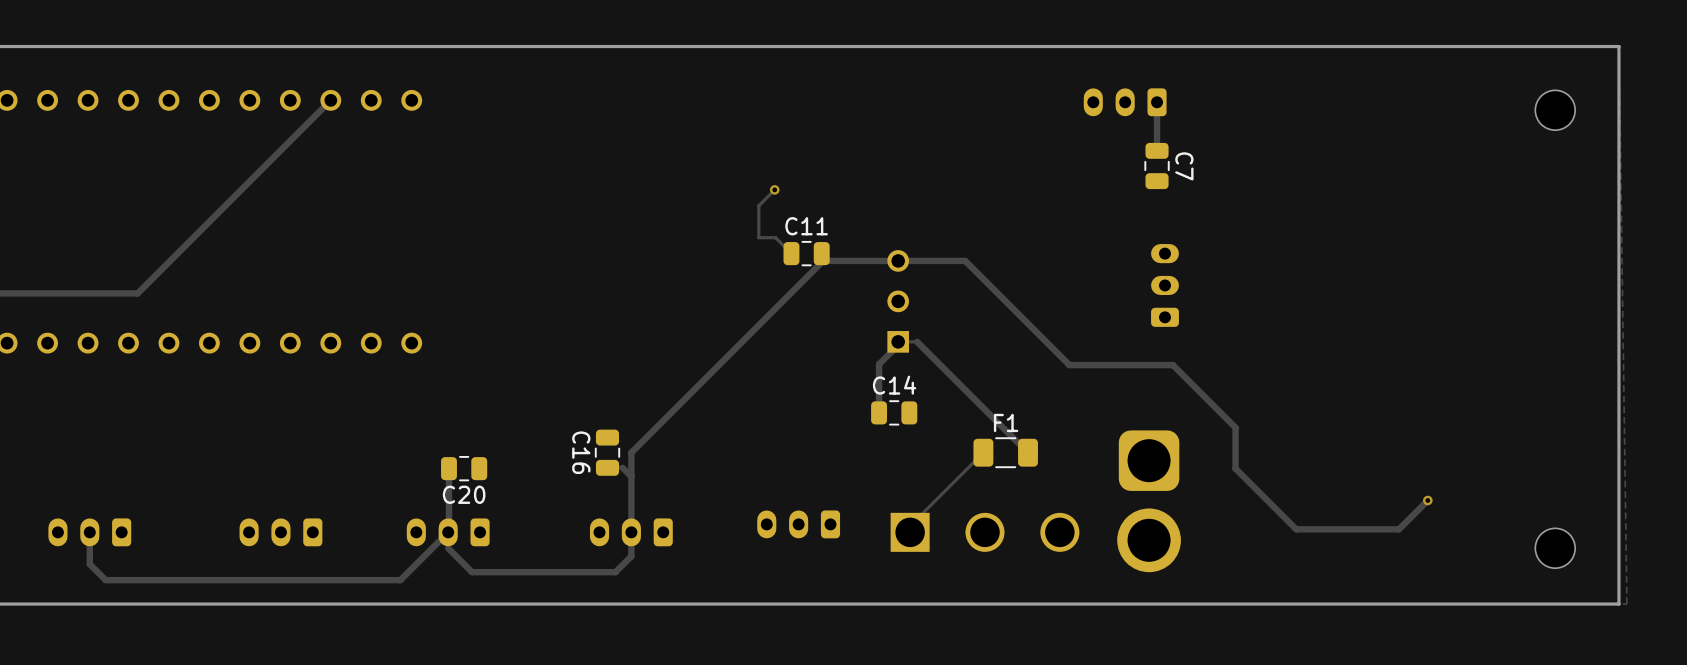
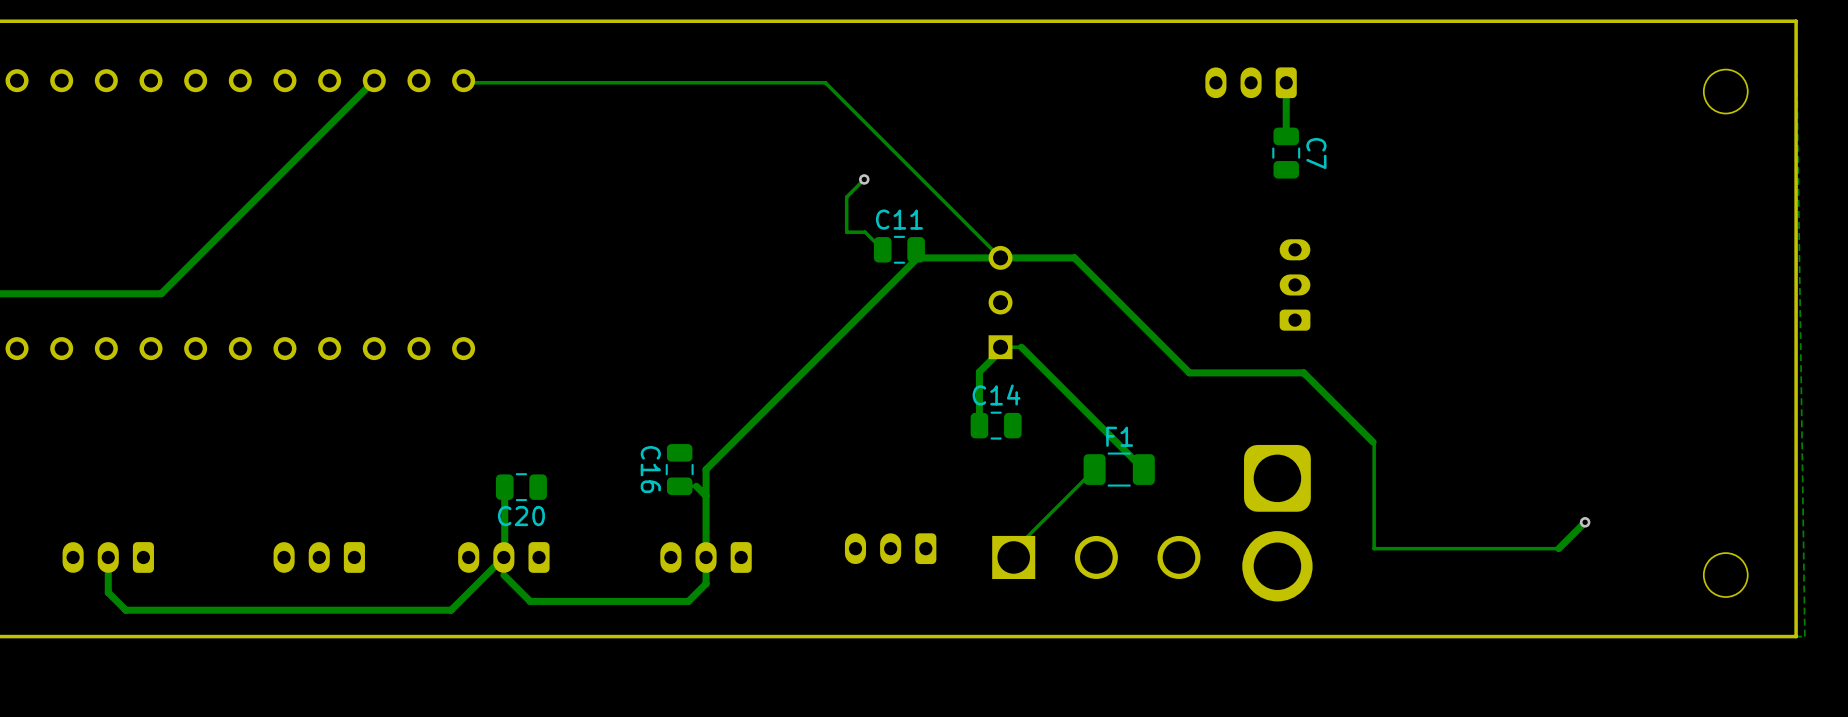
track: none -> (465, 82) (825, 82) (1000, 257)
track: (1235, 427) (1235, 468) (1296, 529) (1398, 529) (1403, 524) -> (1374, 443) (1374, 548) (1558, 548)

